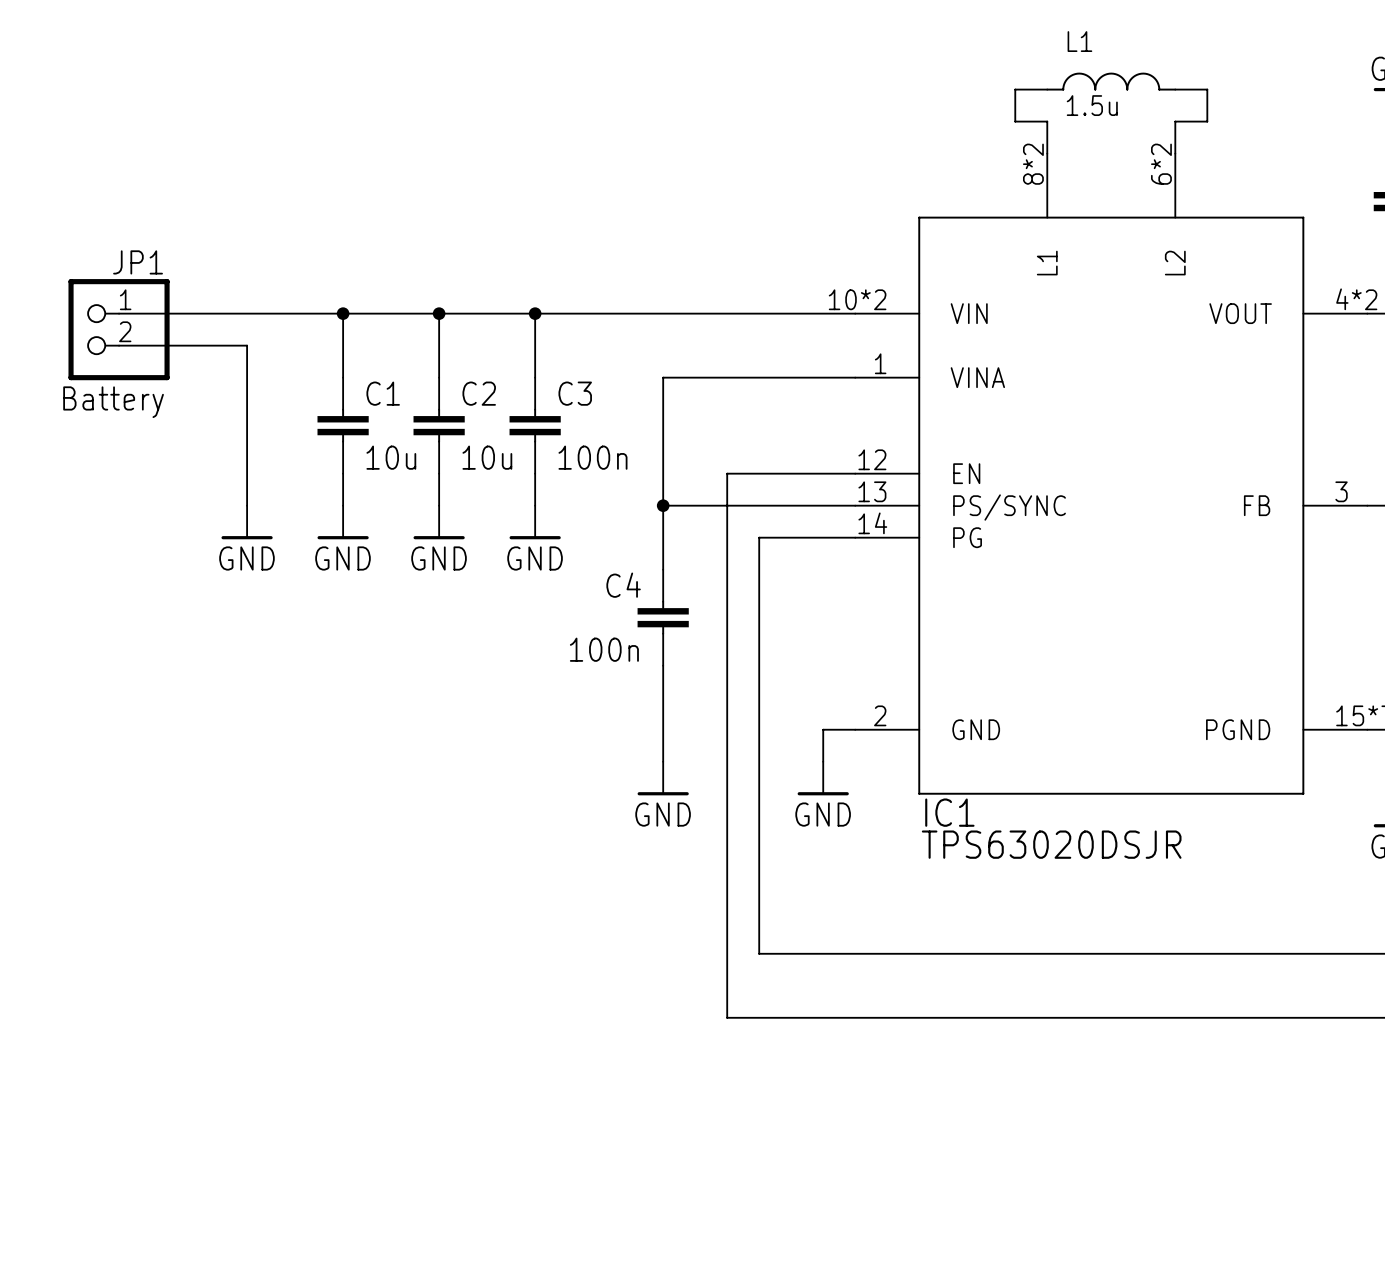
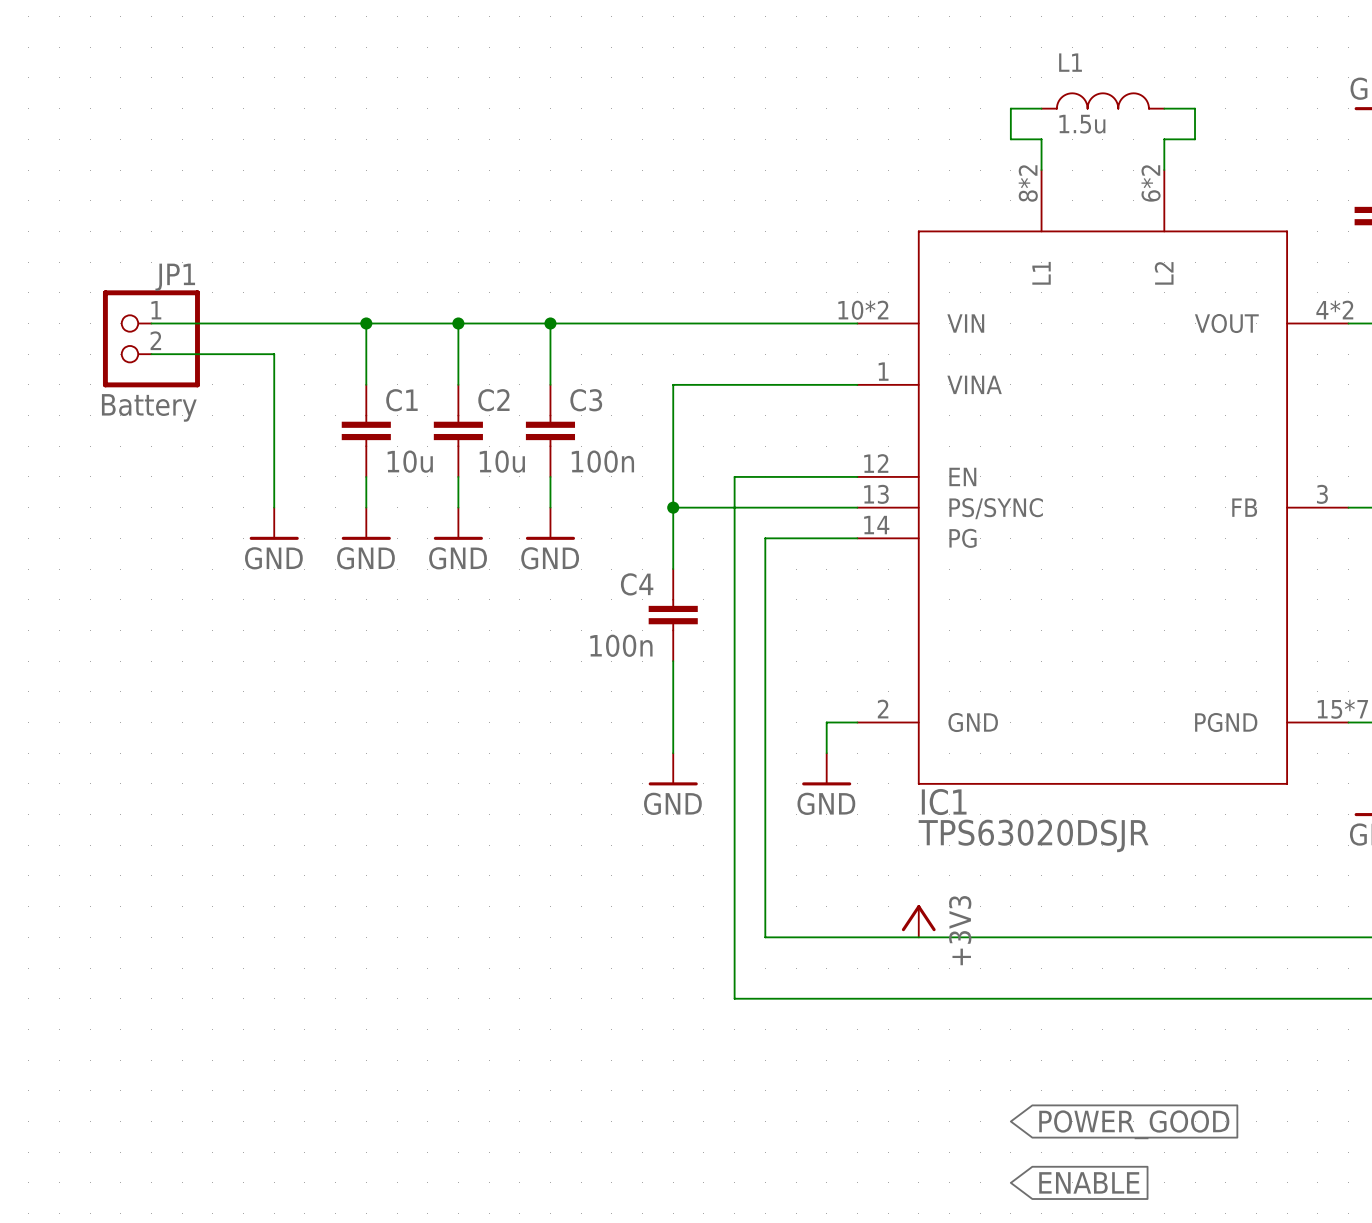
power symbol: none -> +3V3 (918, 921)
global label: none -> POWER_GOOD (1134, 1124)
global label: none -> ENABLE (1089, 1182)

